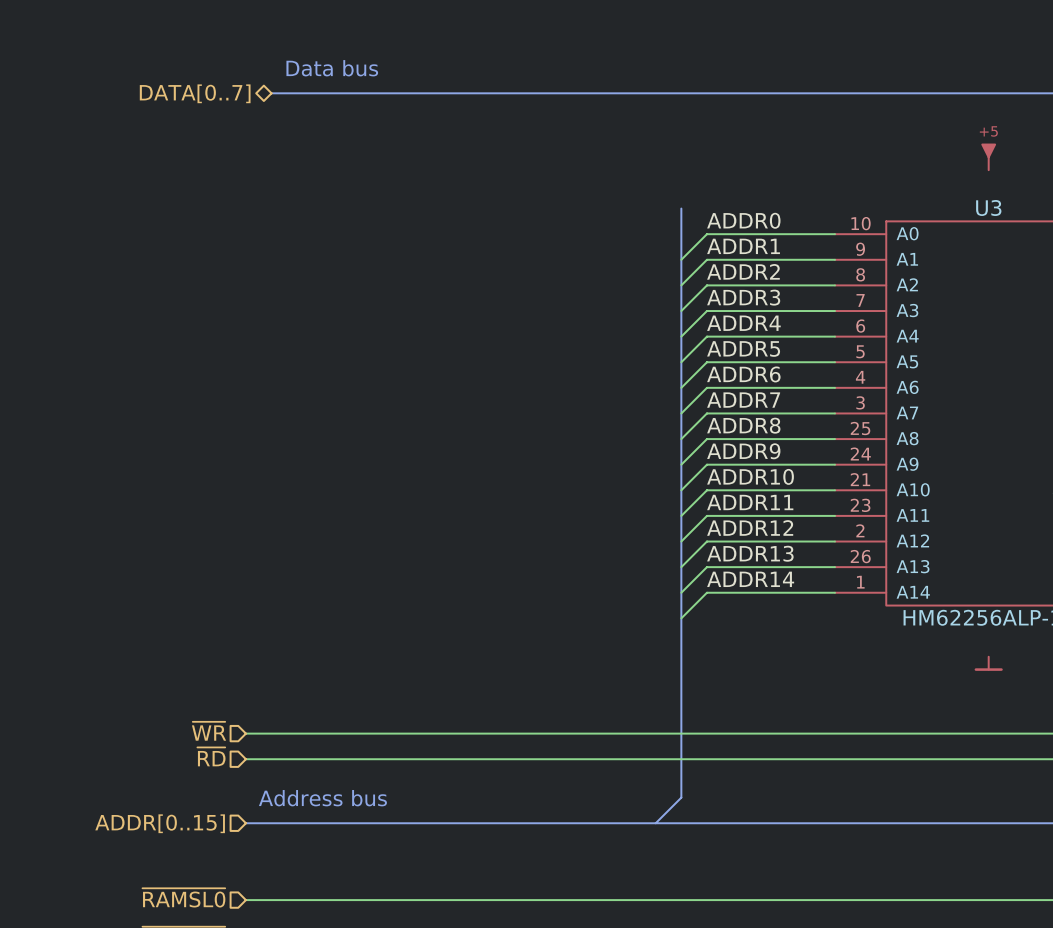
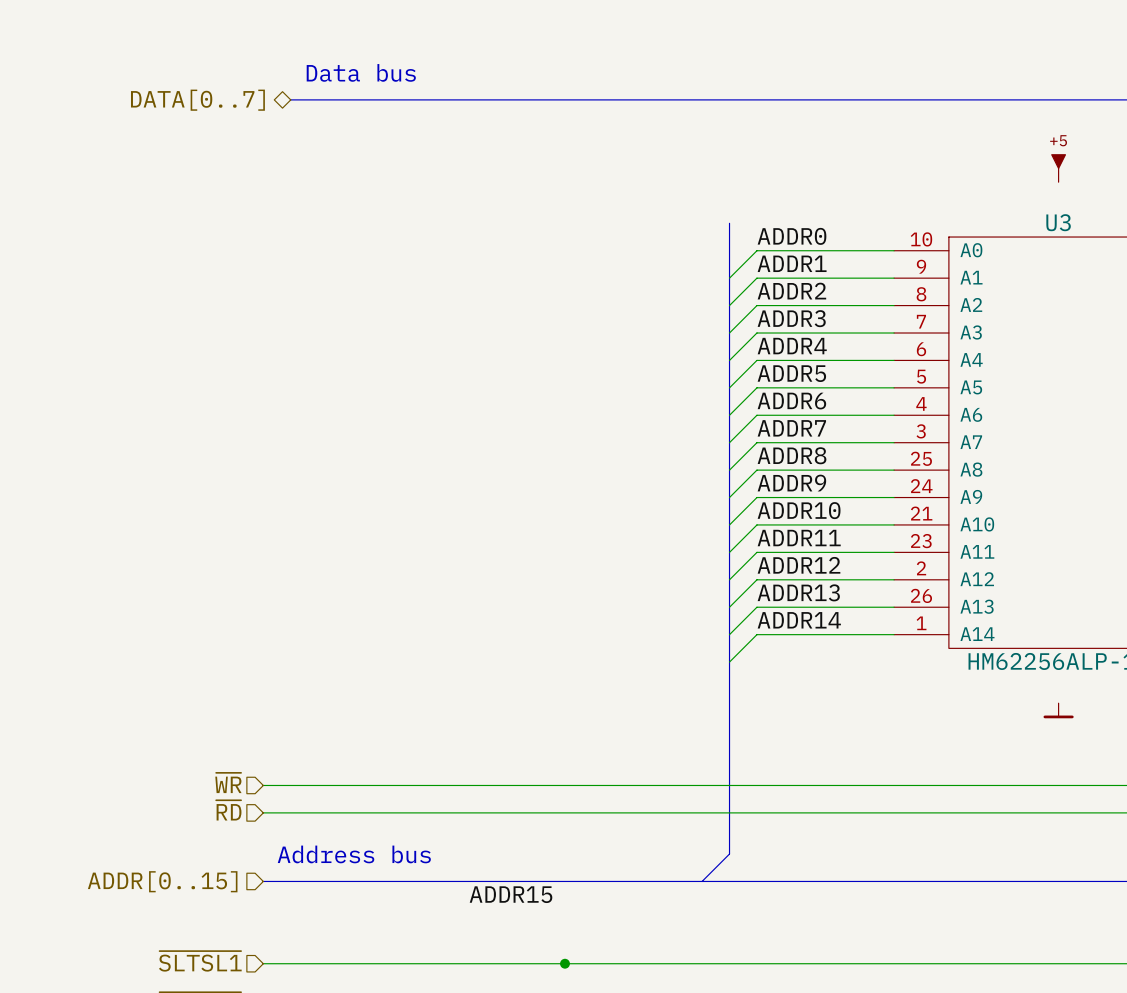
label: none -> ADDR15 (511, 894)
hierarchical label: ~{RAMSL0} (183, 897) -> ~{SLTSL1} (200, 961)
junction: none -> (564, 963)

